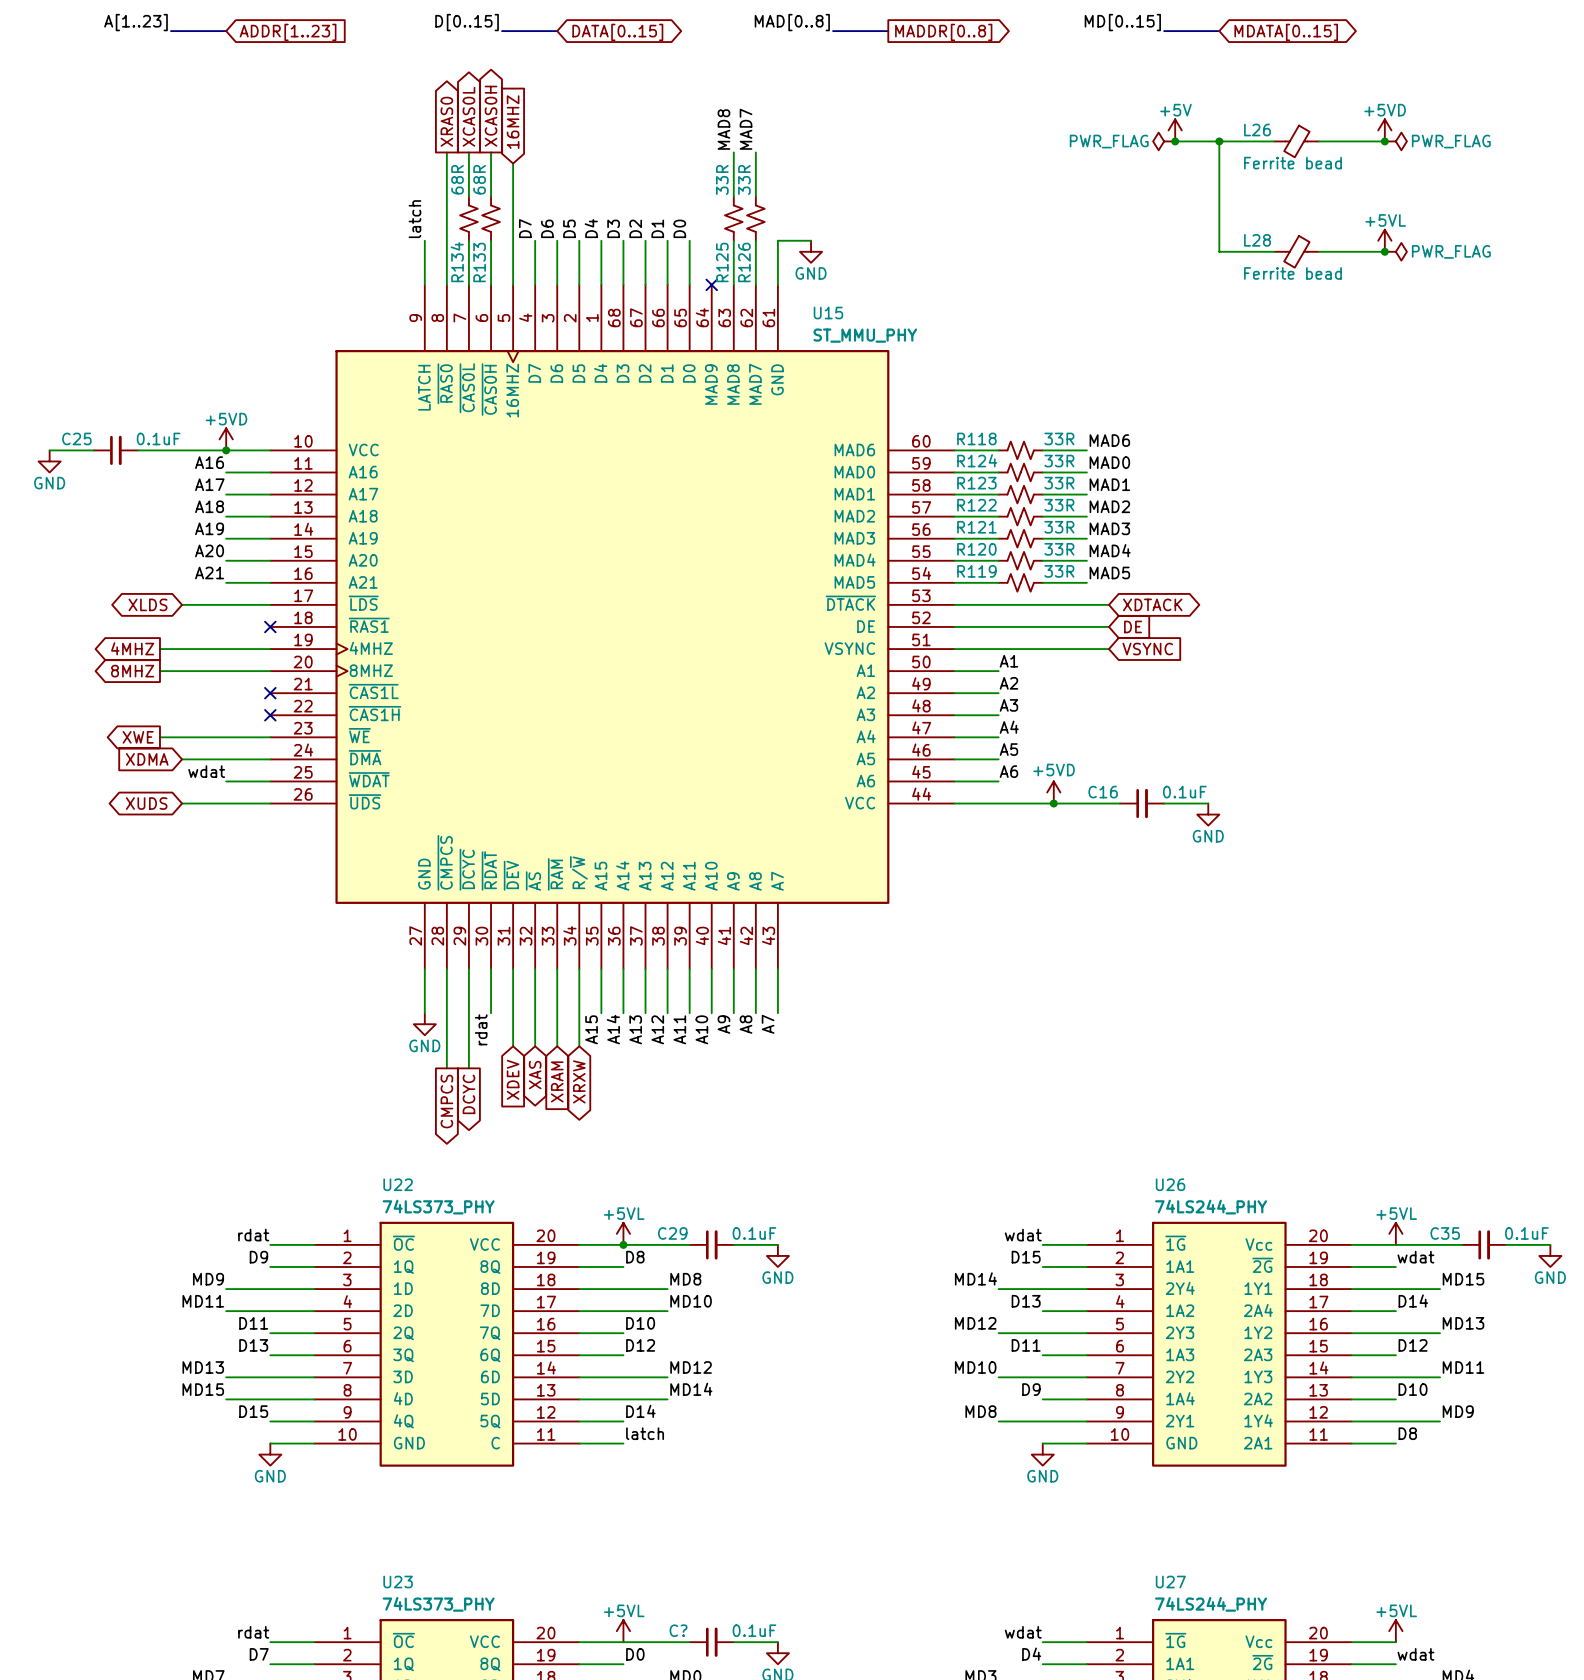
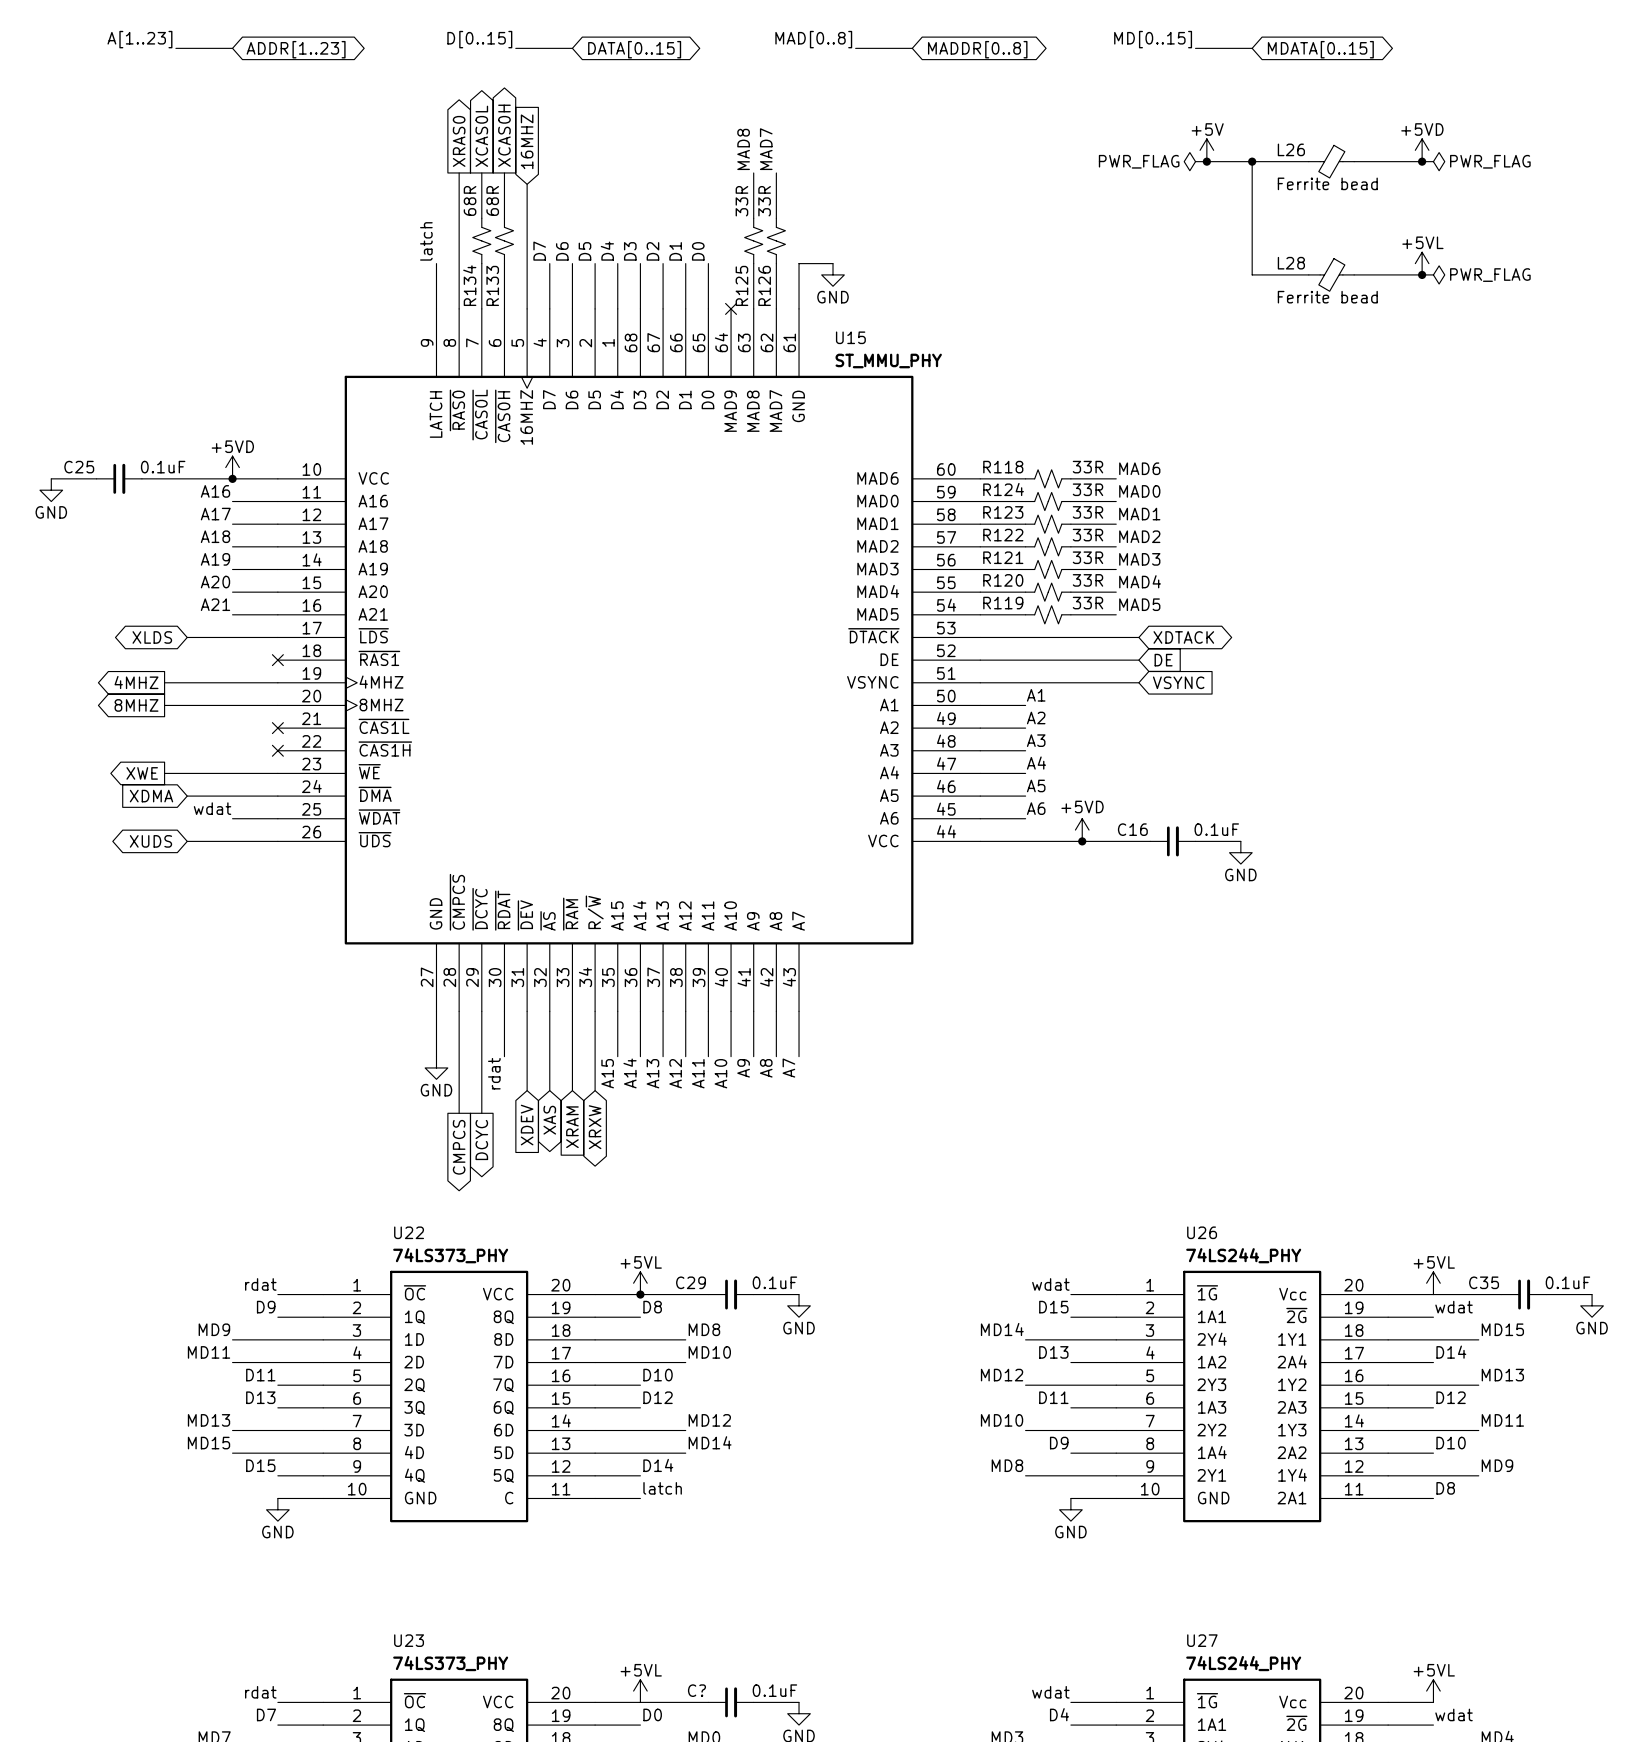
global label shape: input (288, 32) -> bidirectional (296, 49)
global label shape: output (943, 32) -> bidirectional (977, 49)

